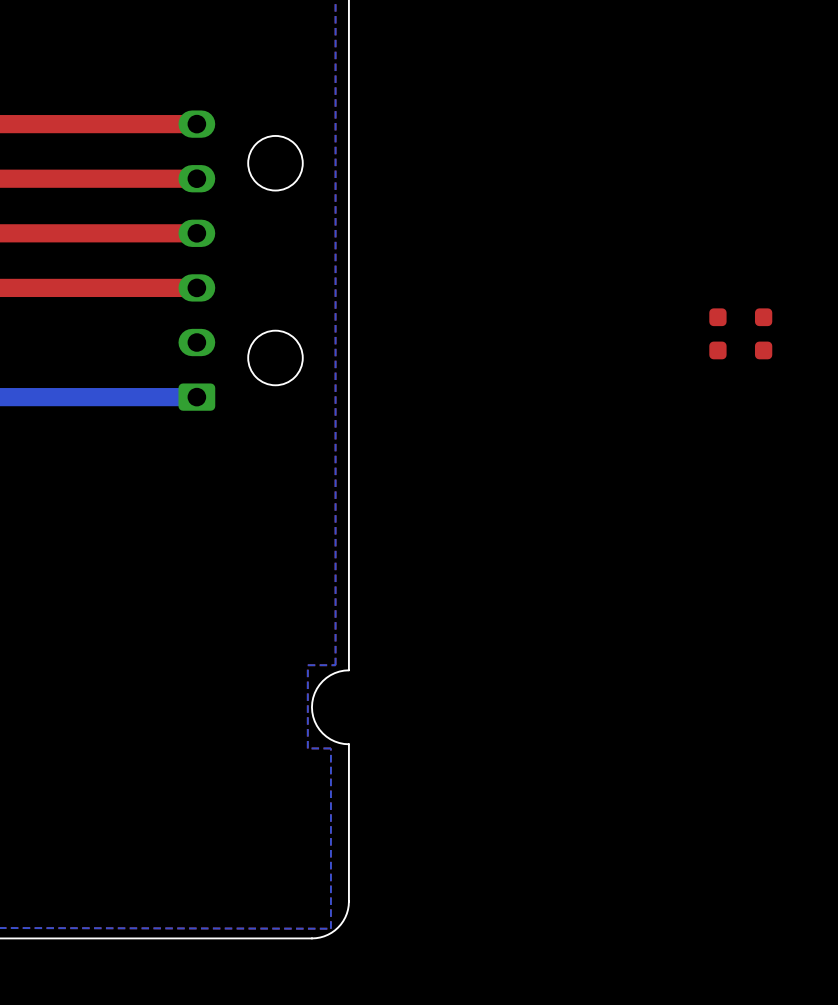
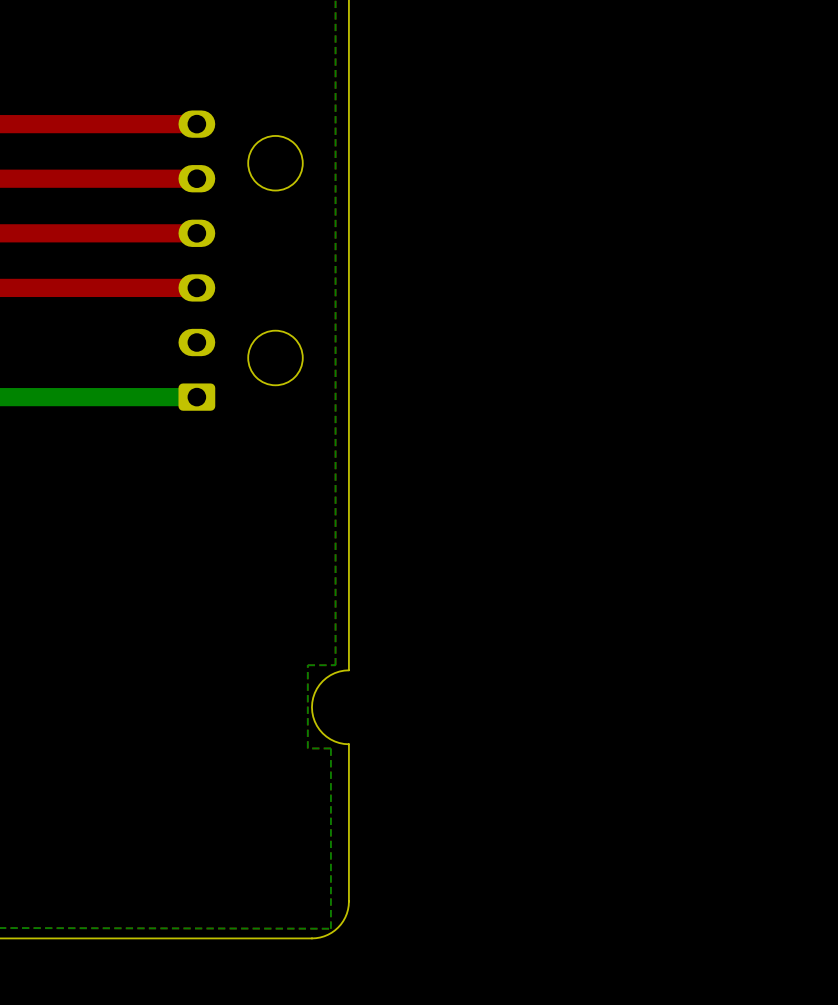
part: (717, 333) -> none
part: (763, 333) -> none

